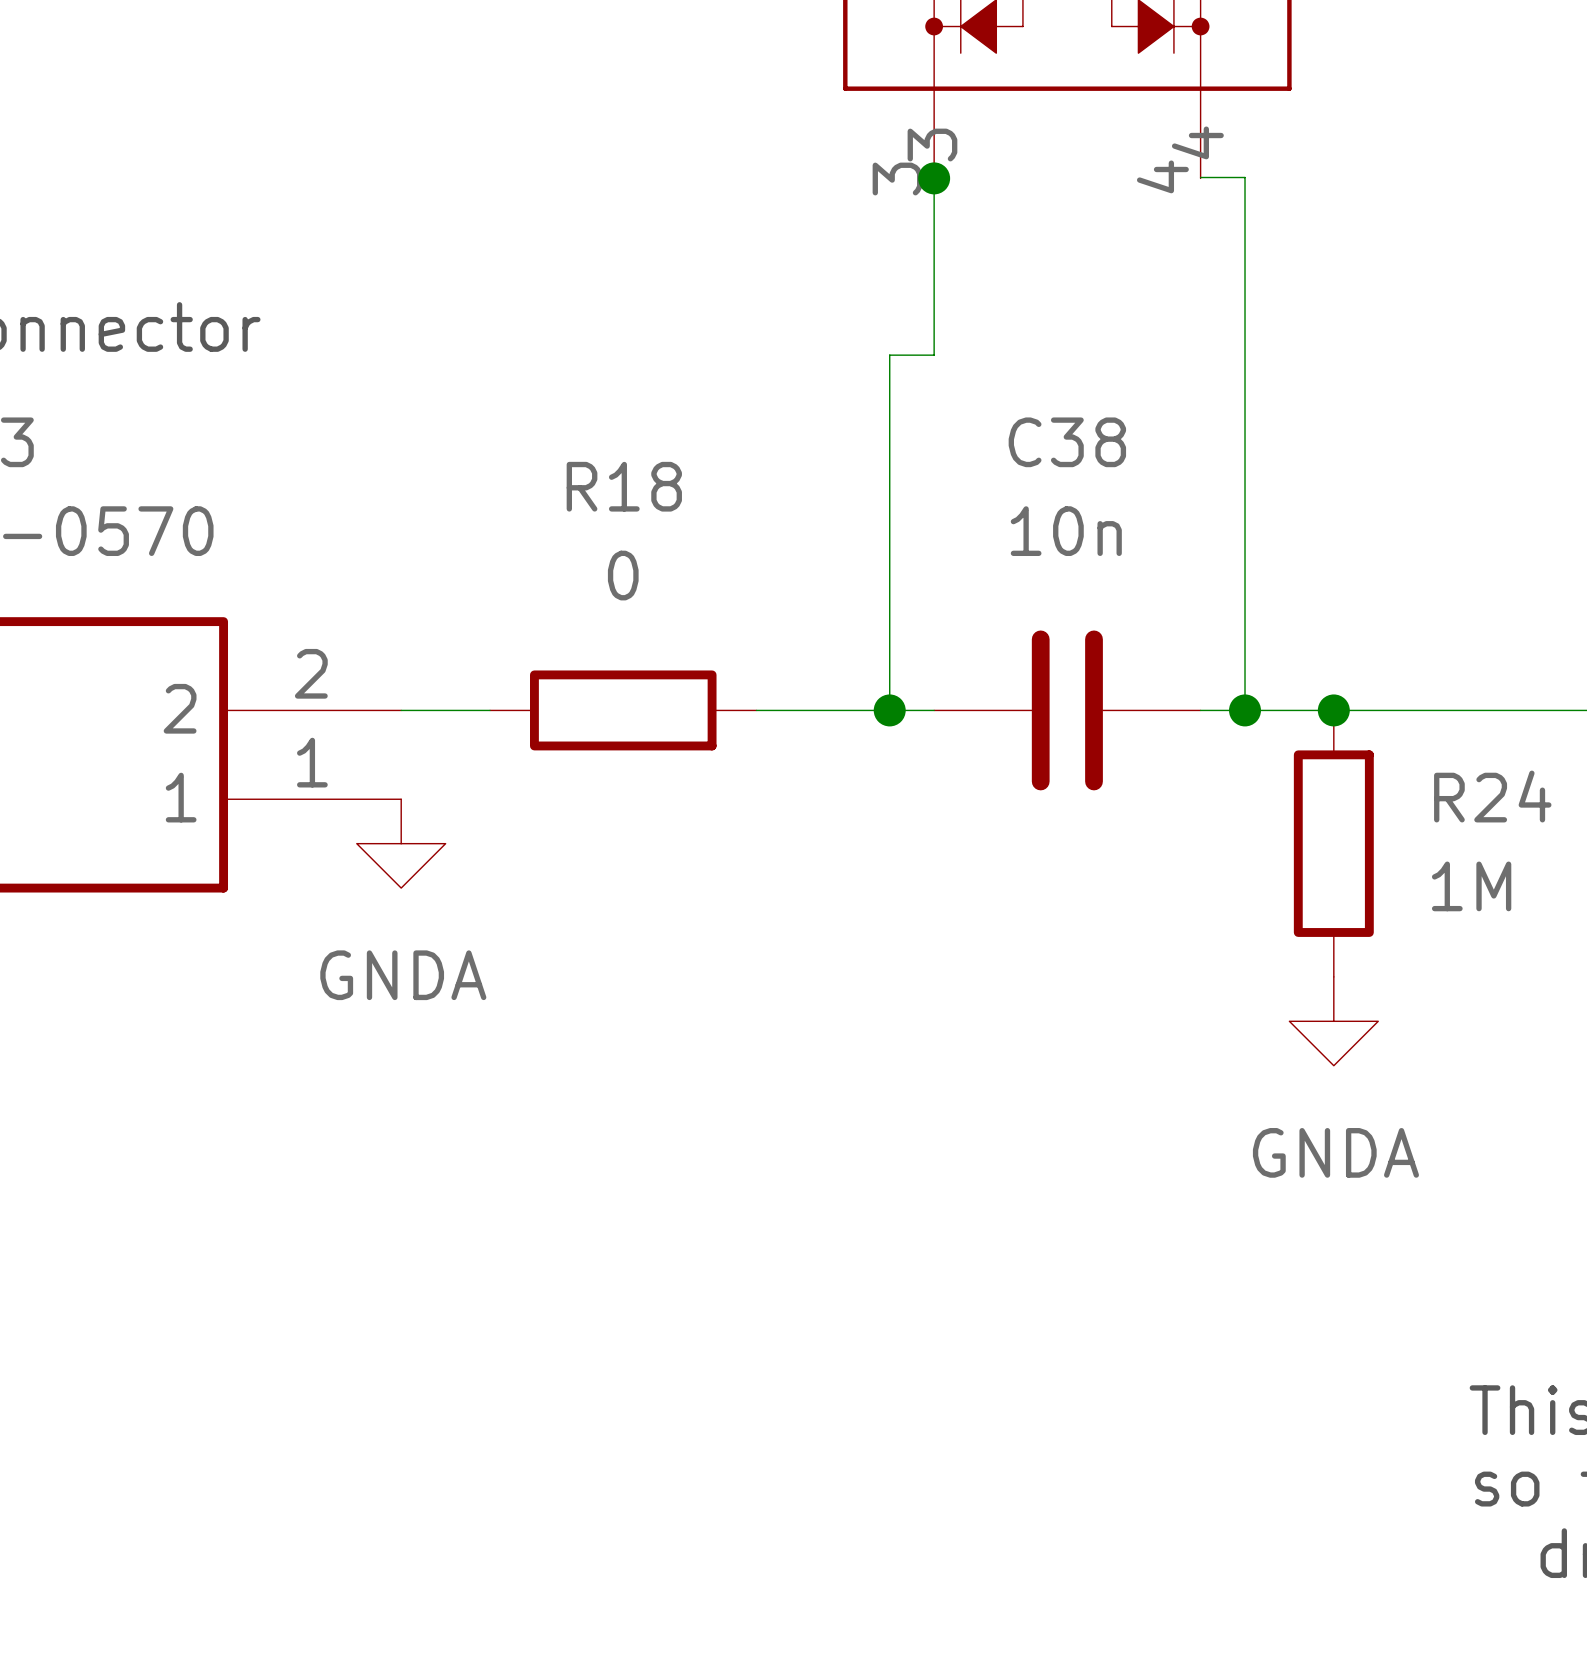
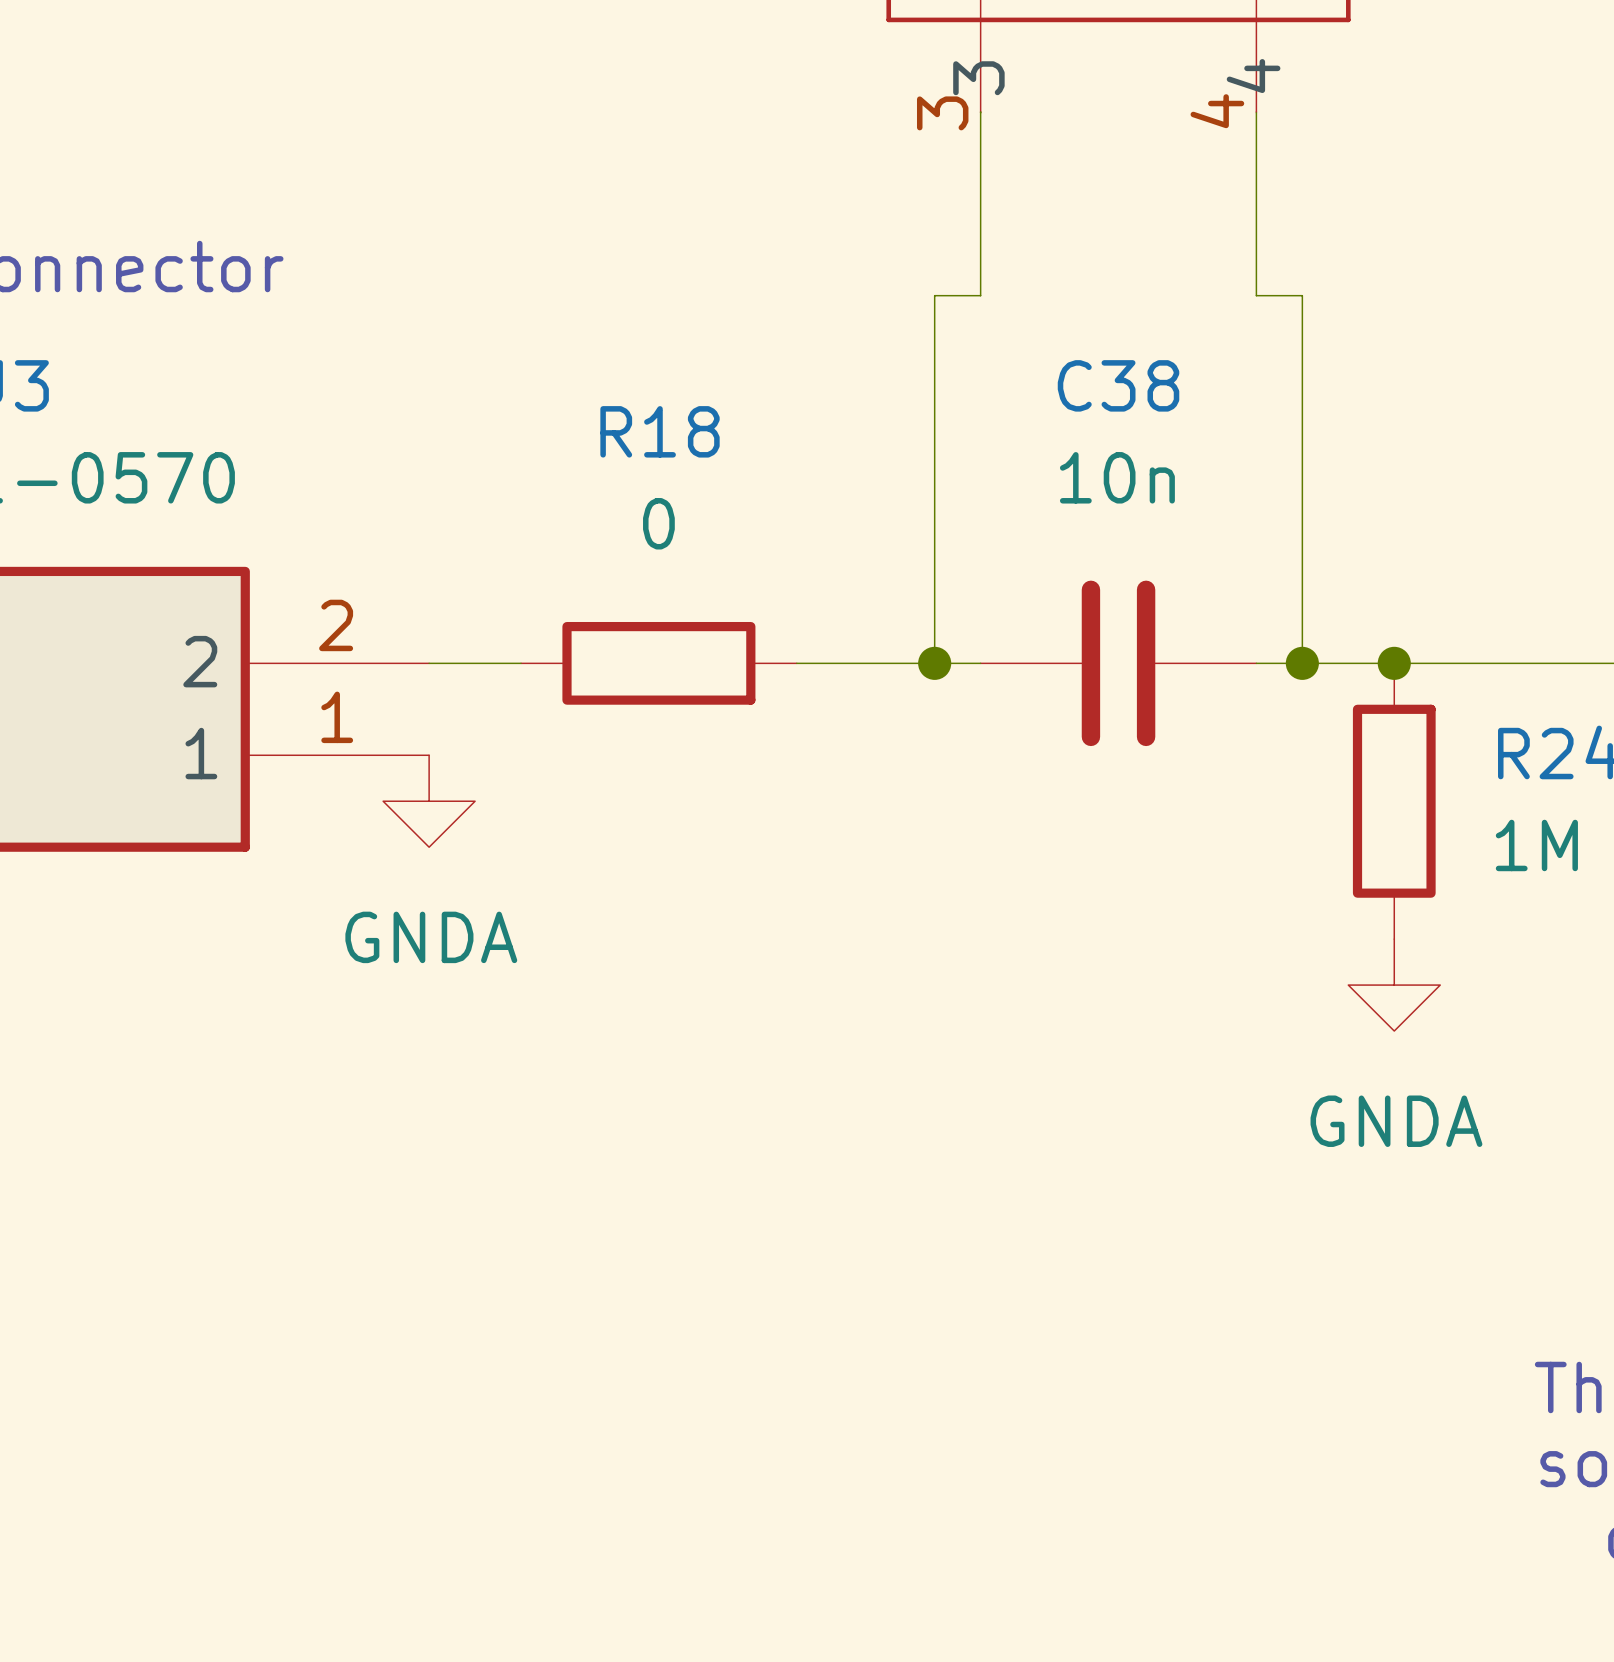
wire: (1200, 177) (1245, 177) (1245, 355) -> (1256, 112) (1256, 295) (1302, 295)
junction: (934, 178) -> none

